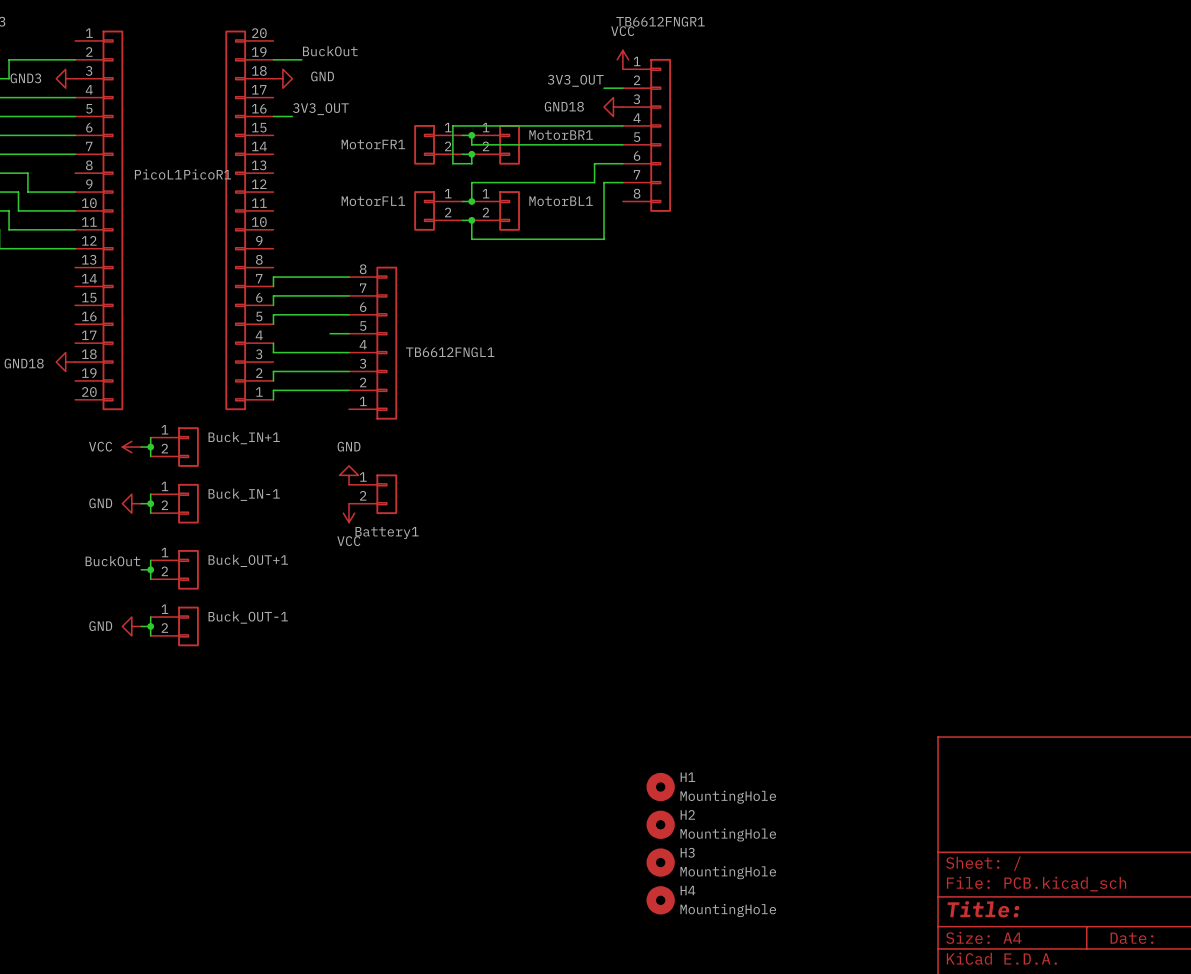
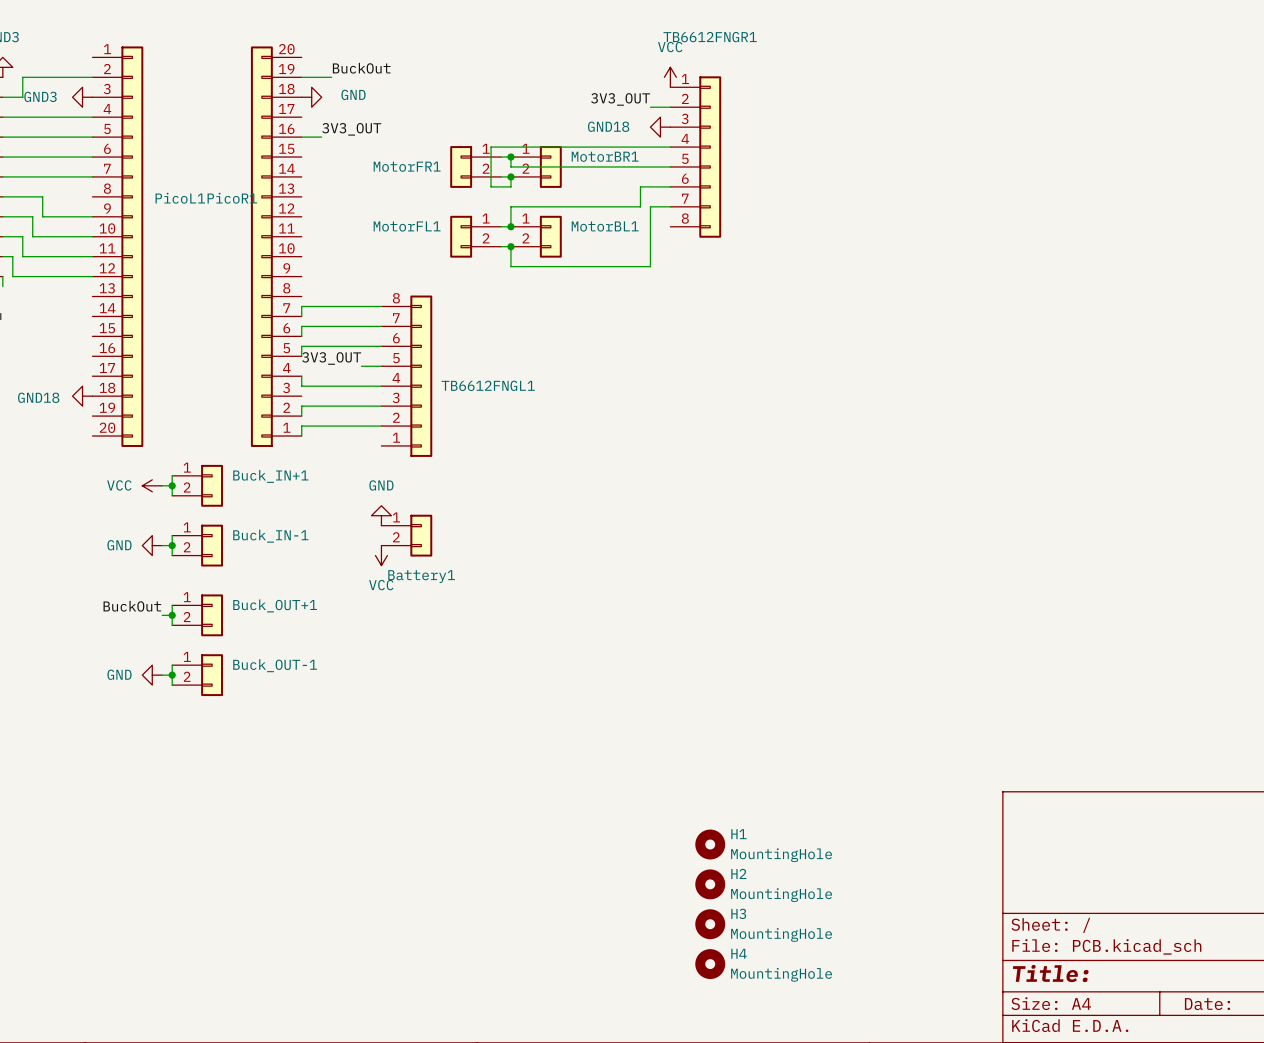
label: none -> 3V3_OUT (331, 358)

